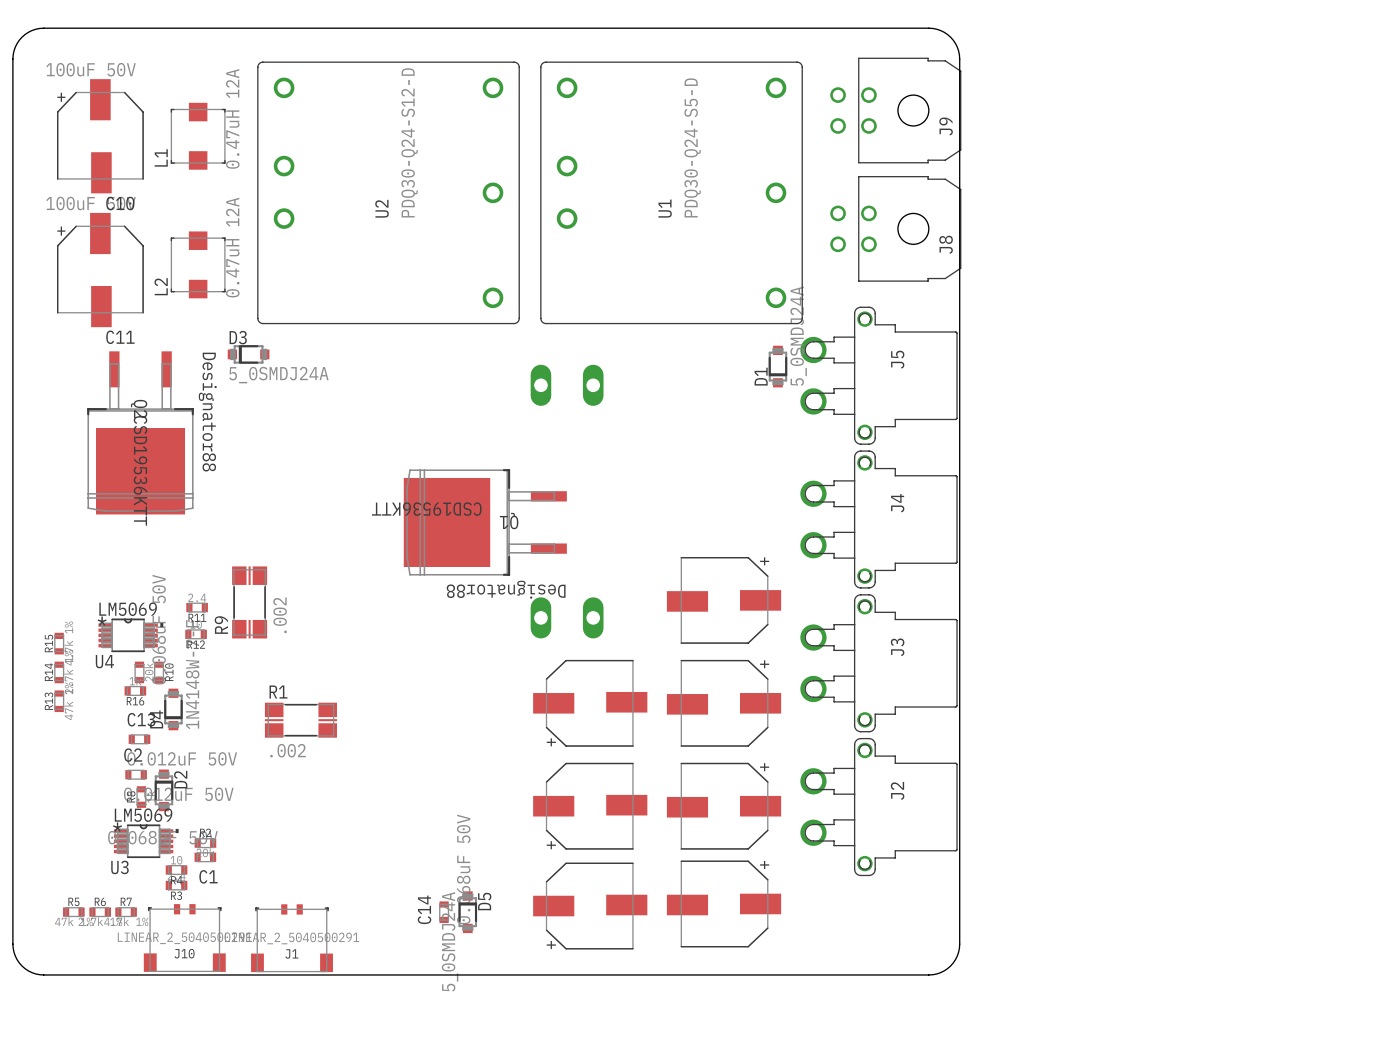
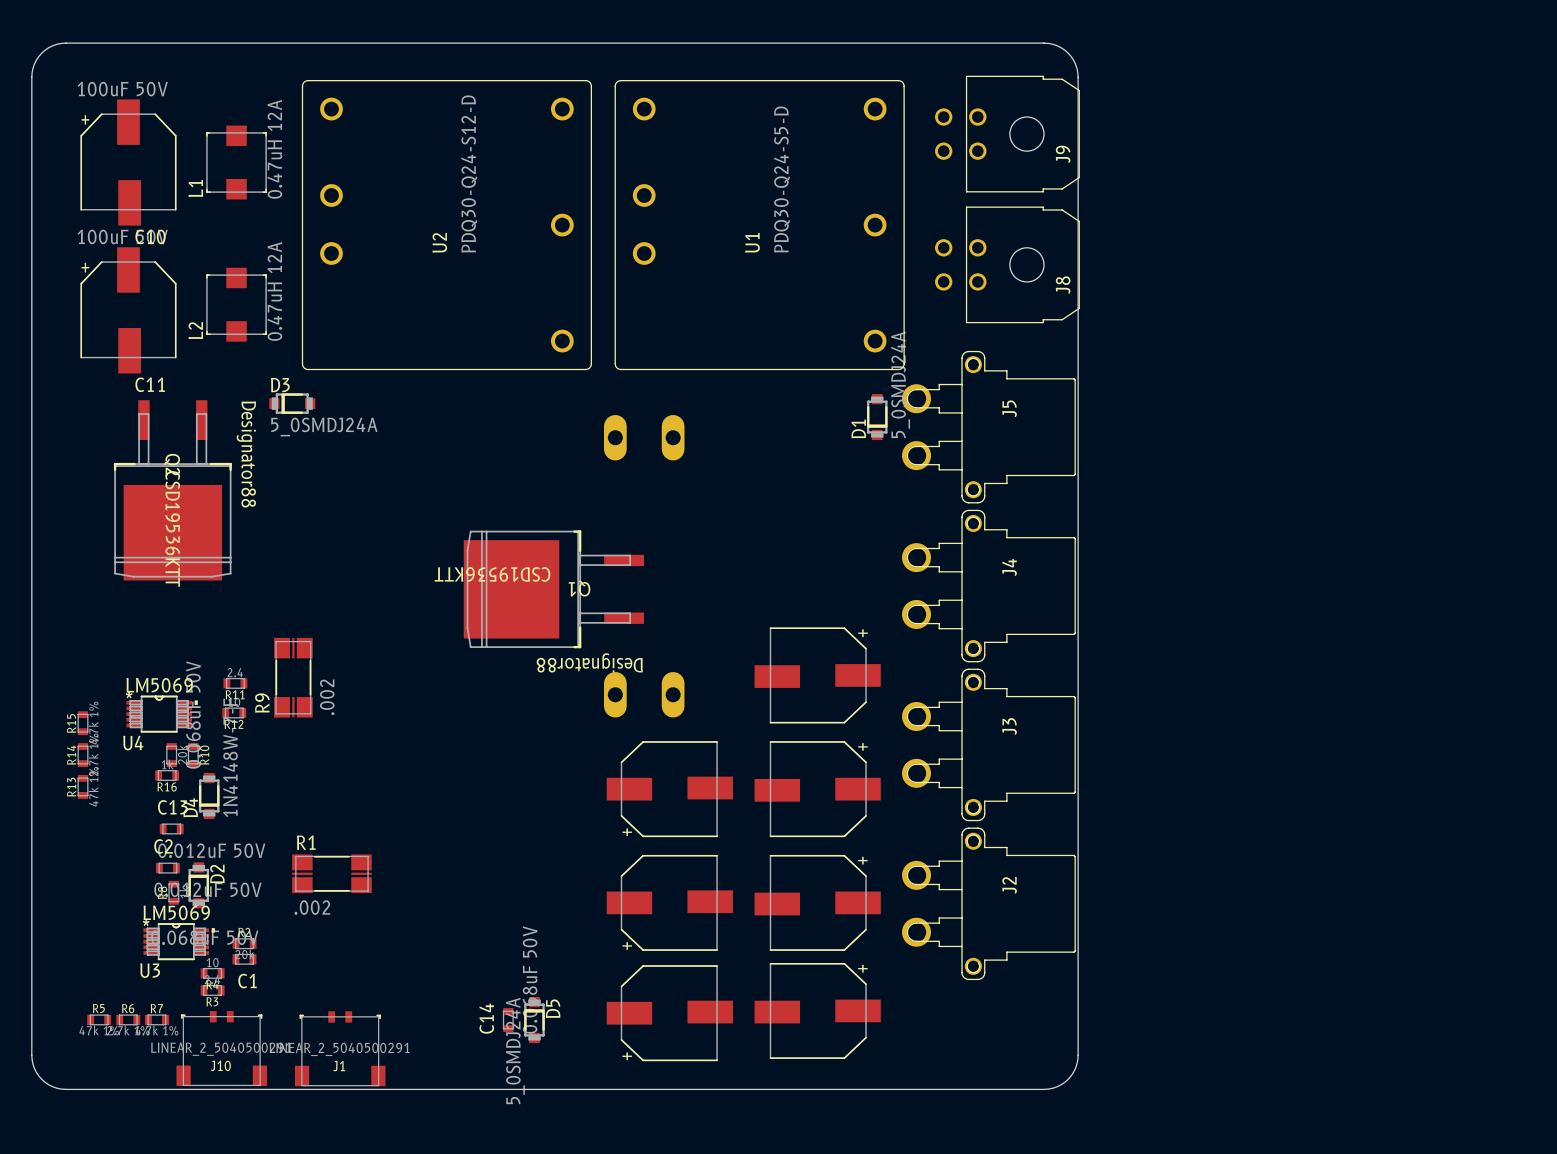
R1 position: (300, 720) -> (331, 873)

